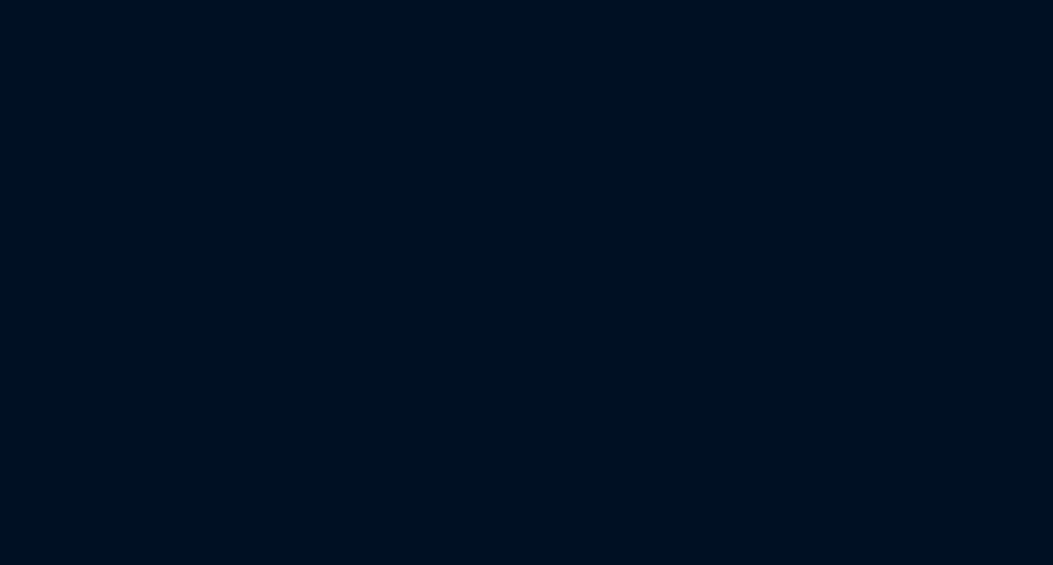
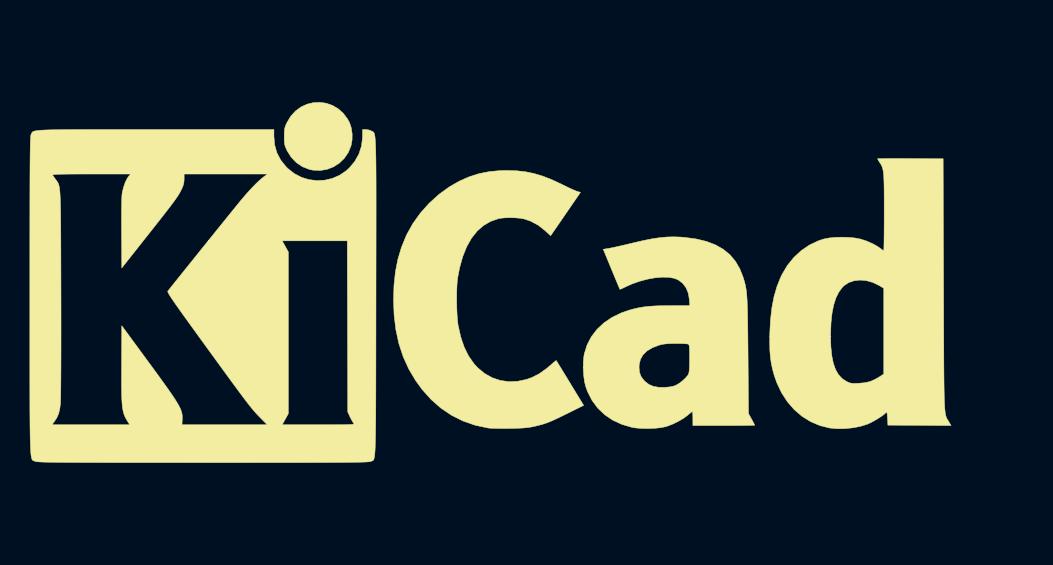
drawing: none -> [29, 102, 952, 463]

